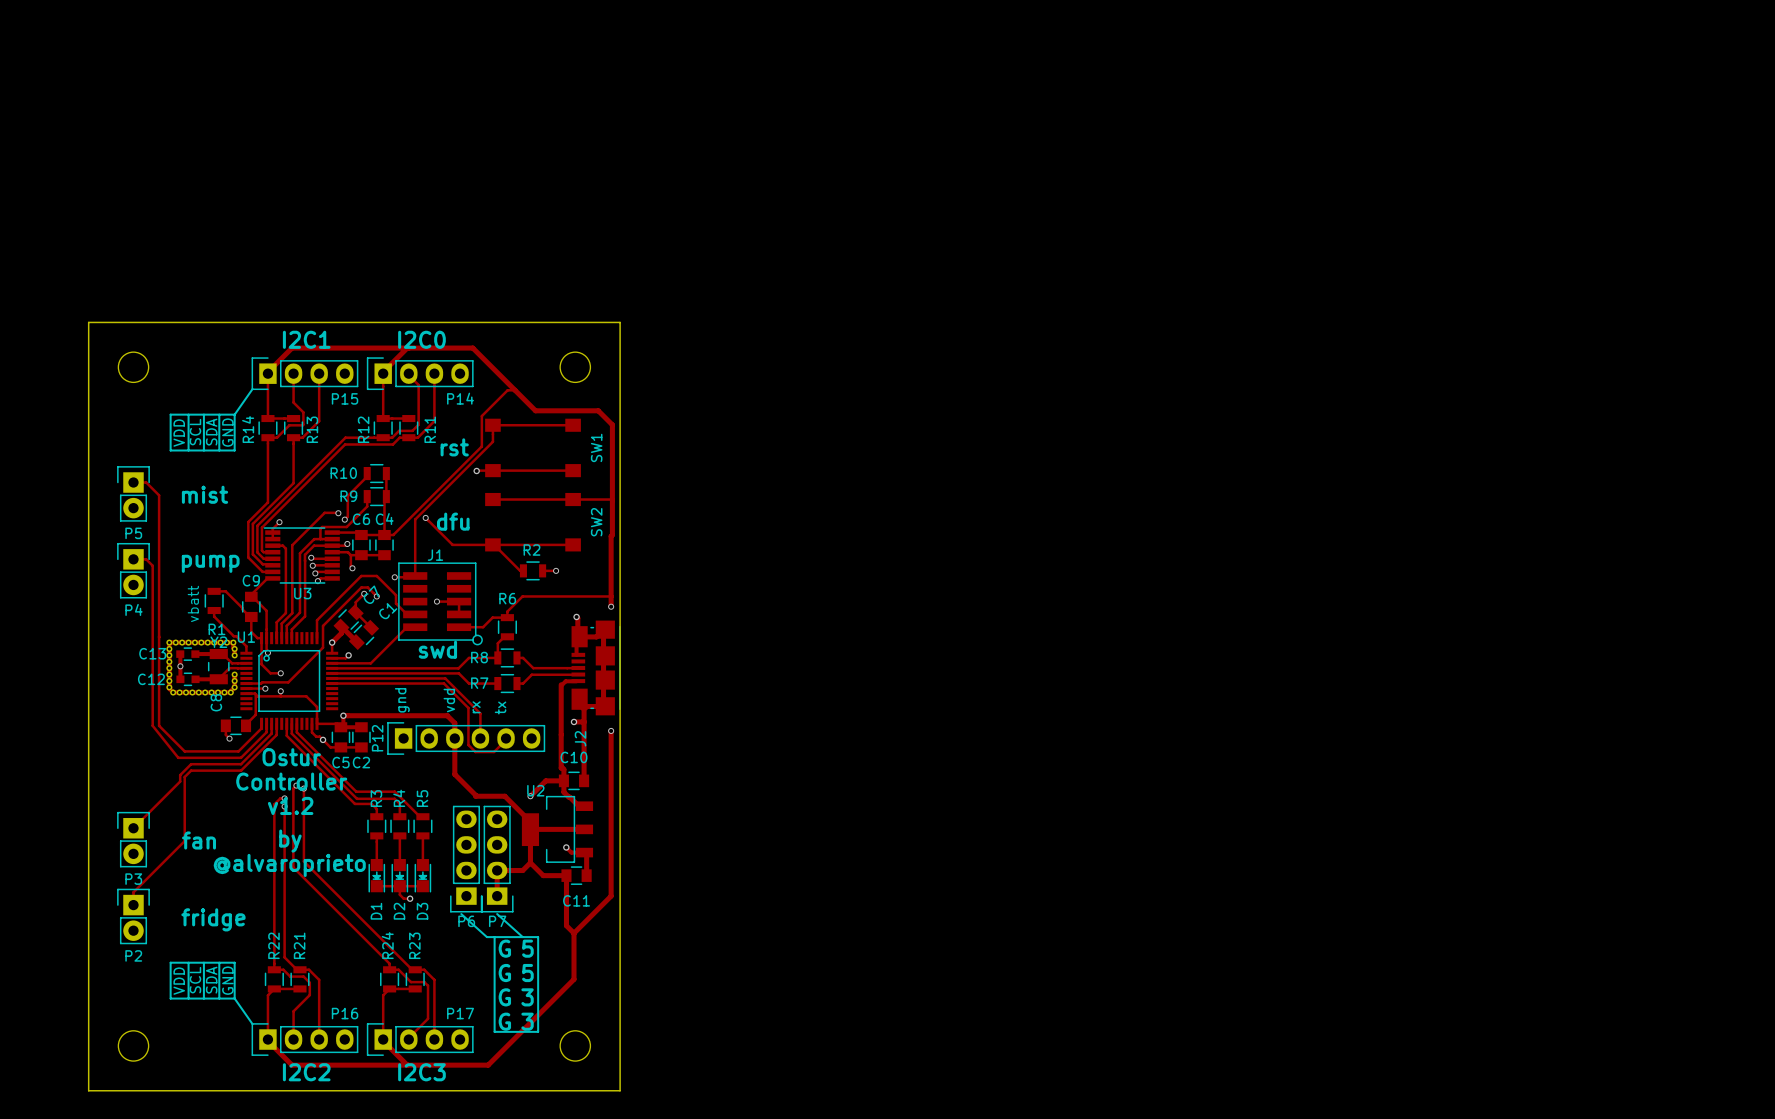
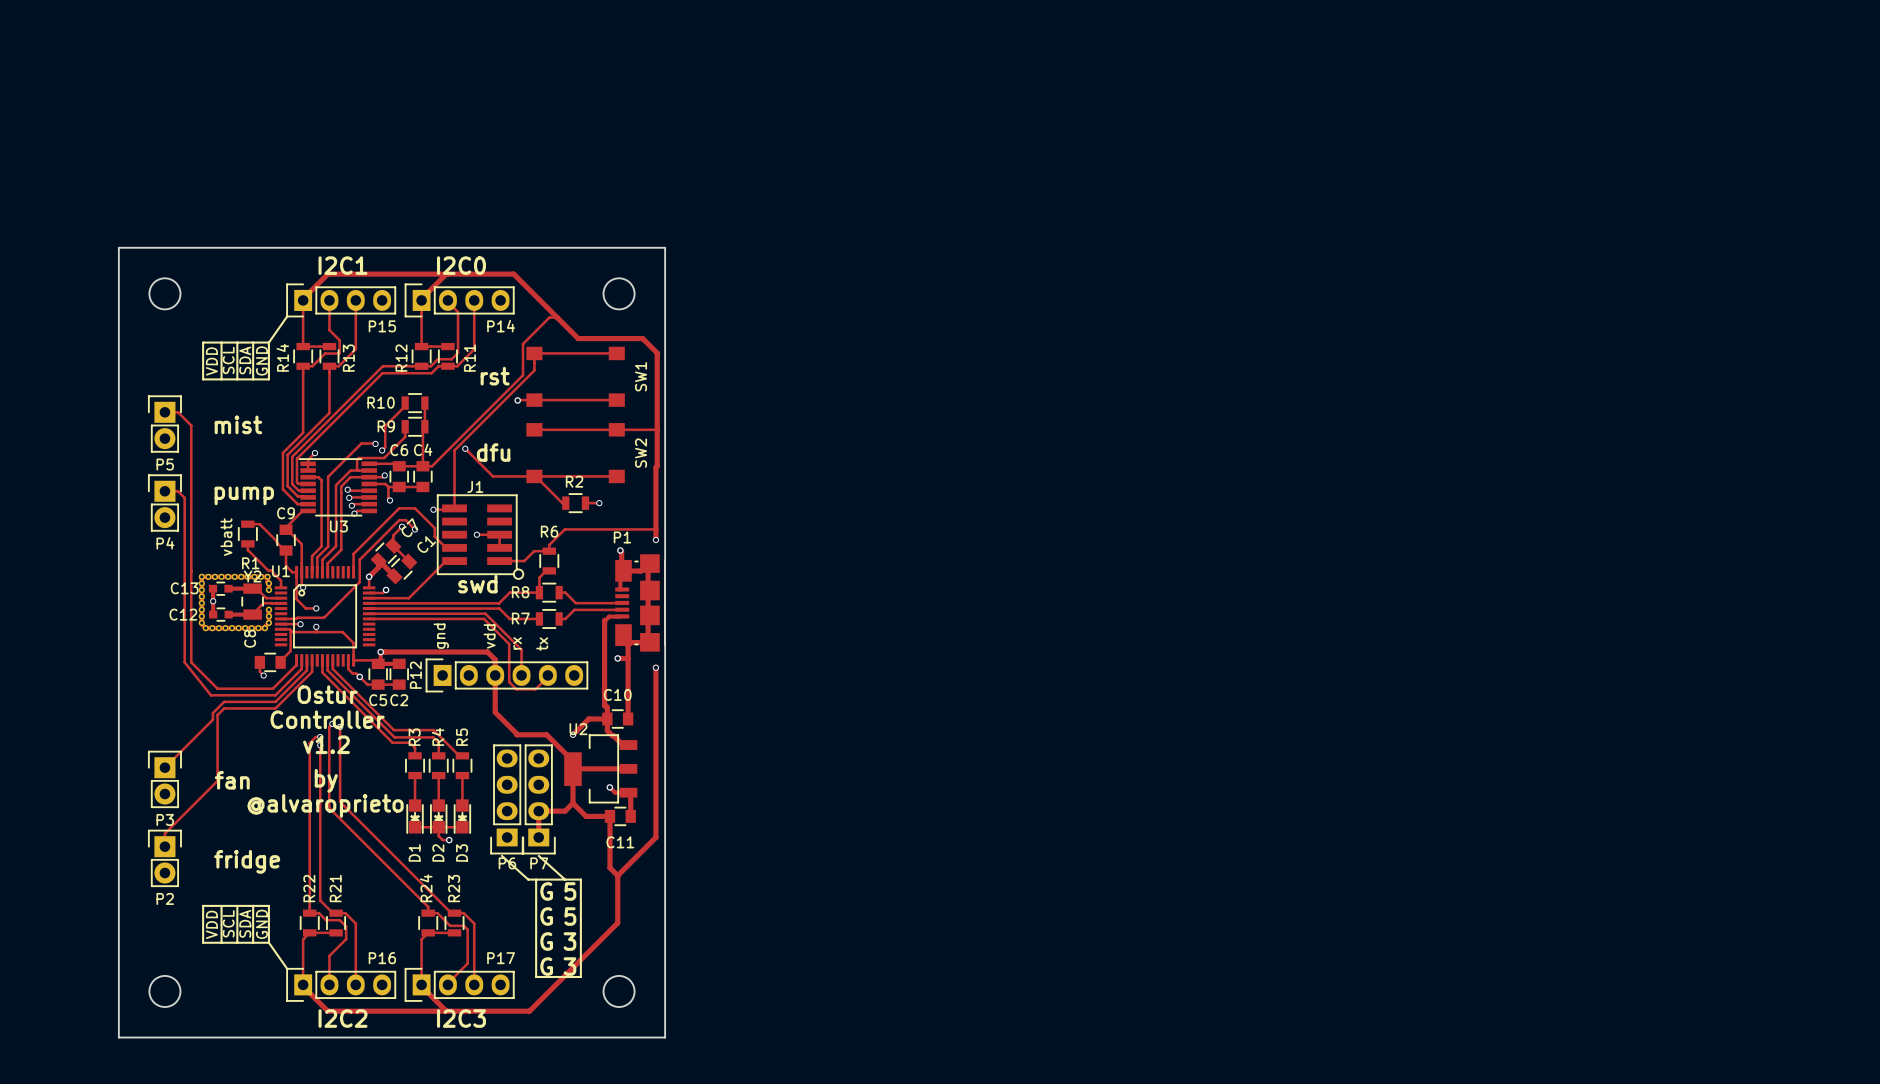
J2 name: J2 (580, 738) -> P1 (622, 537)

